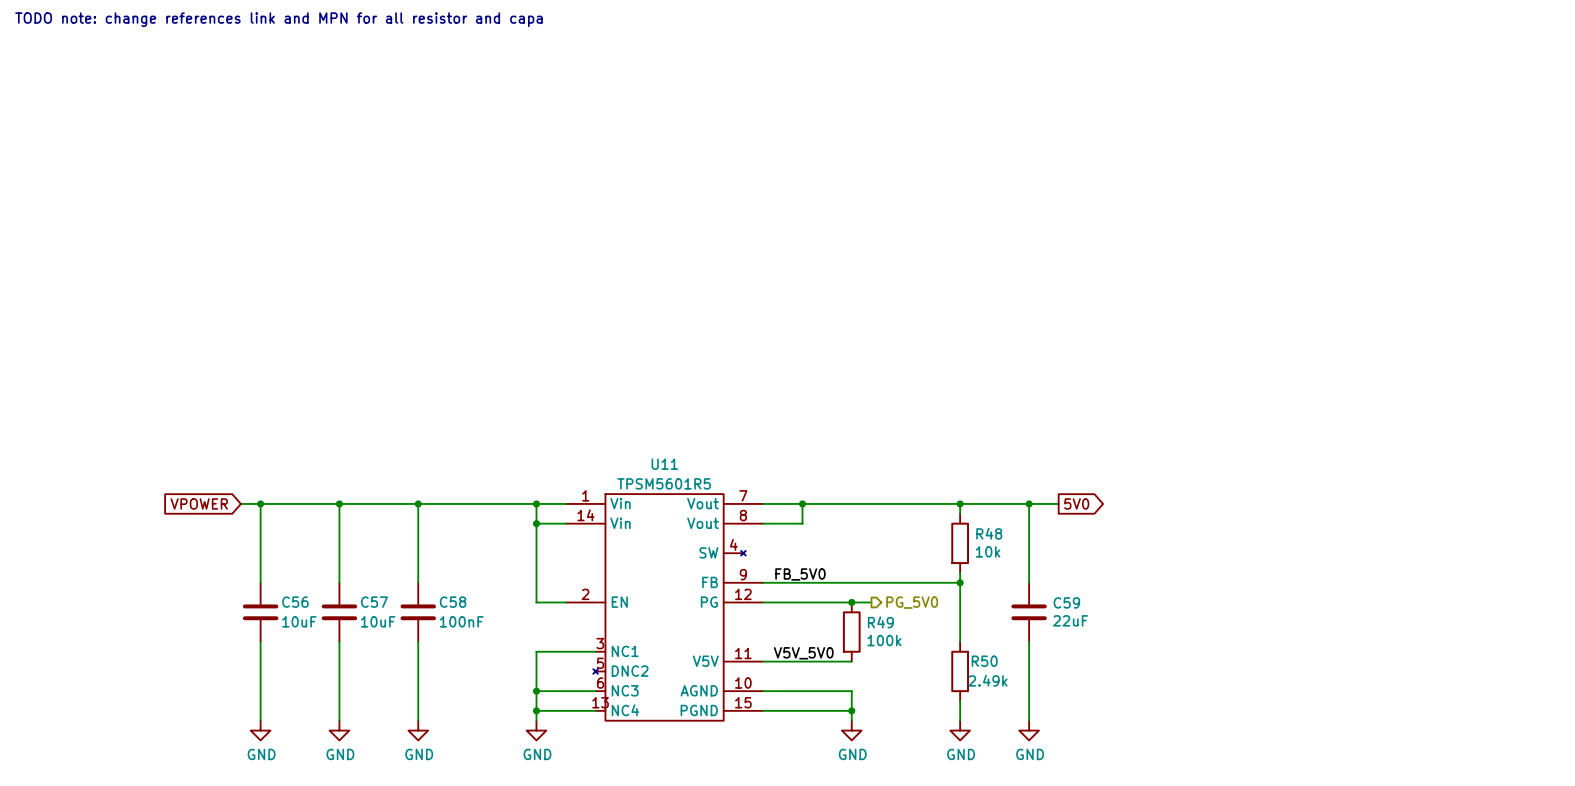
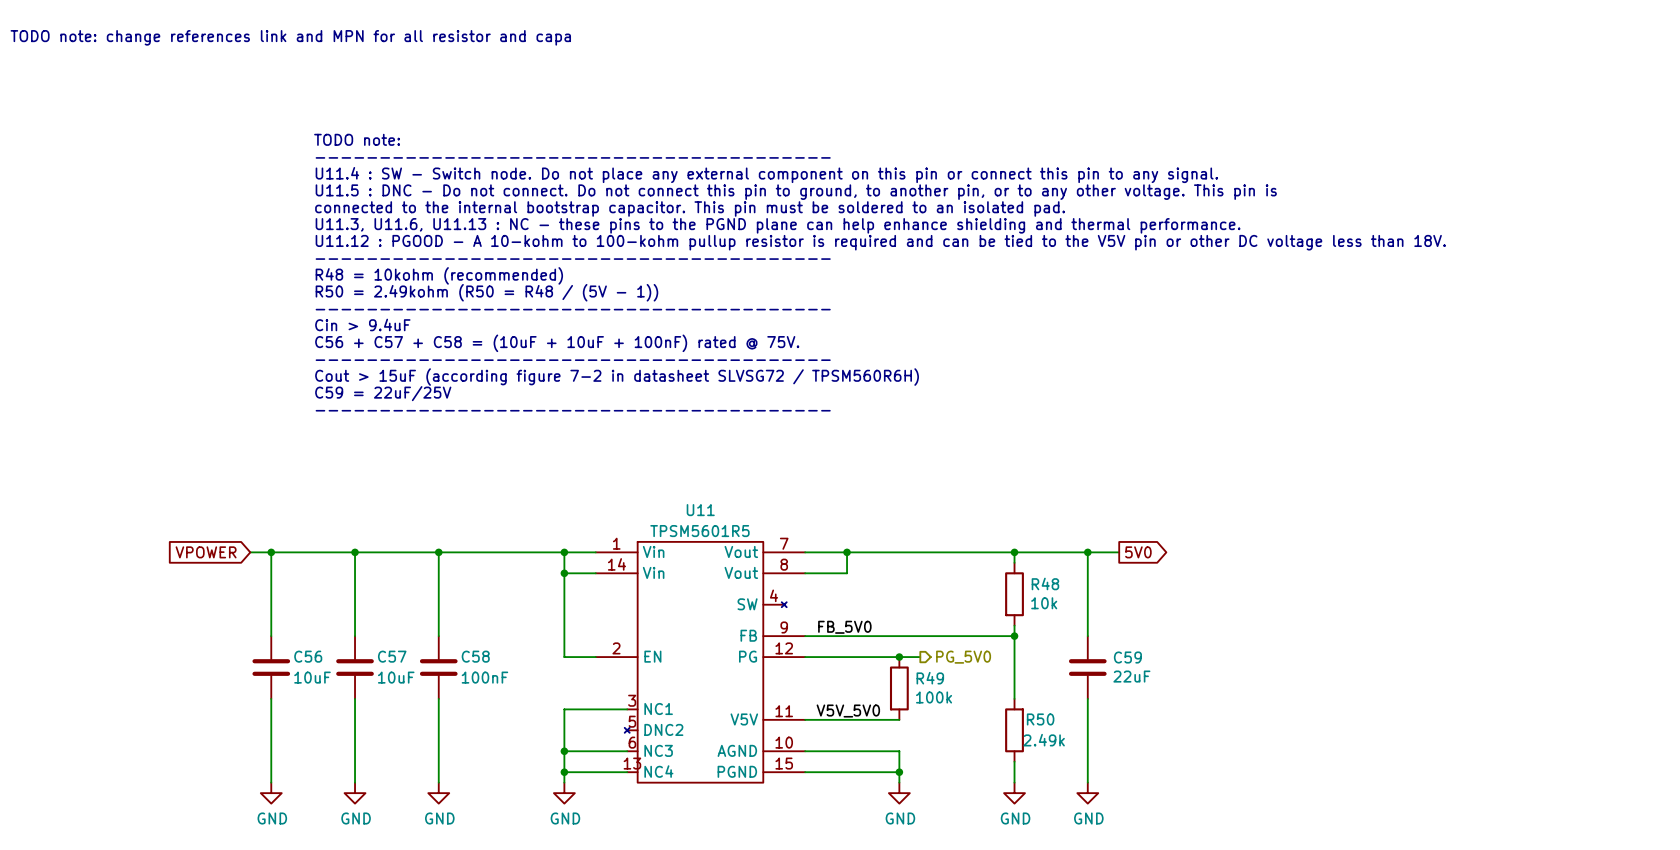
text: none -> TODO note: (357, 139)
text: none -> ---------------------------------------- (573, 157)
text: none -> U11.4 : SW - Switch node. Do not place any external component on this pin or connect this pin to any signal. (766, 175)
text: none -> U11.5 : DNC - Do not connect. Do not connect this pin to ground, to another pin, or to any other voltage. This pin is (796, 192)
text: none -> connected to the internal bootstrap capacitor. This pin must be soldered to an isolated pad. (690, 208)
text: none -> U11.3, U11.6, U11.13 : NC - these pins to the PGND plane can help enhance shielding and thermal performance. (778, 225)
text: none -> U11.12 : PGOOD - A 10-kohm to 100-kohm pullup resistor is required and can be tied to the V5V pin or other DC voltage less than 18V. (880, 242)
text: none -> ---------------------------------------- (573, 259)
text: none -> R48 = 10kohm (recommended) (439, 275)
text: none -> R50 = 2.49kohm (R50 = R48 / (5V - 1)) (486, 292)
text: none -> ---------------------------------------- (573, 309)
text: none -> Cin > 9.4uF (362, 324)
text: none -> C56 + C57 + C58 = (10uF + 10uF + 100nF) rated @ 75V. (557, 343)
text: none -> ---------------------------------------- (573, 360)
text: none -> Cout > 15uF (according figure 7-2 in datasheet SLVSG72 / TPSM560R6H) (617, 377)
text: none -> C59 = 22uF/25V (383, 393)
text: none -> ---------------------------------------- (573, 410)

